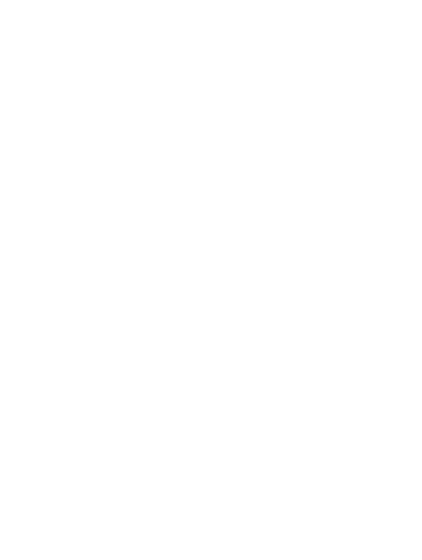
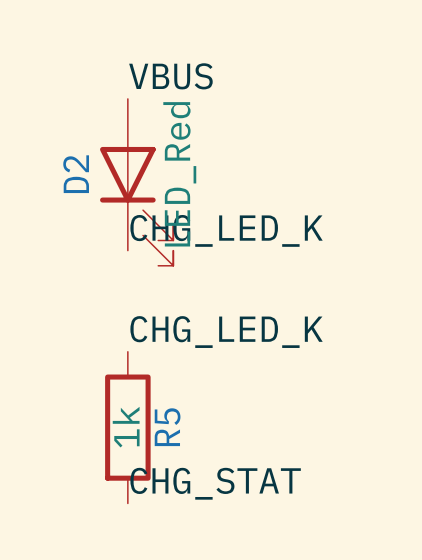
label: none -> VBUS (170, 76)
D2: none -> LED_Red (136, 182)
label: none -> CHG_LED_K (226, 230)
label: none -> CHG_LED_K (226, 332)
R5: none -> 1k (127, 427)
label: none -> CHG_STAT (215, 483)

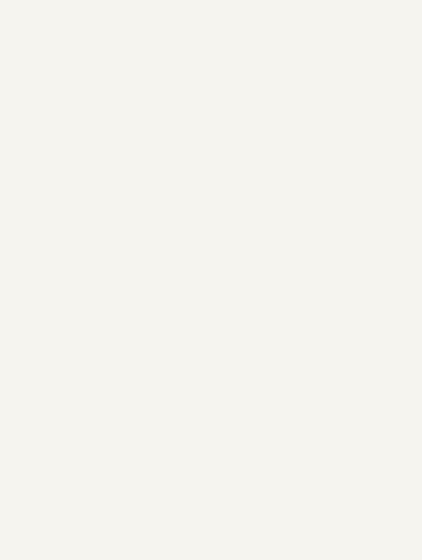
label: VBUS (170, 76) -> none
D2: LED_Red (136, 182) -> none
label: CHG_LED_K (226, 230) -> none
label: CHG_LED_K (226, 332) -> none
R5: 1k (127, 427) -> none
label: CHG_STAT (215, 483) -> none

